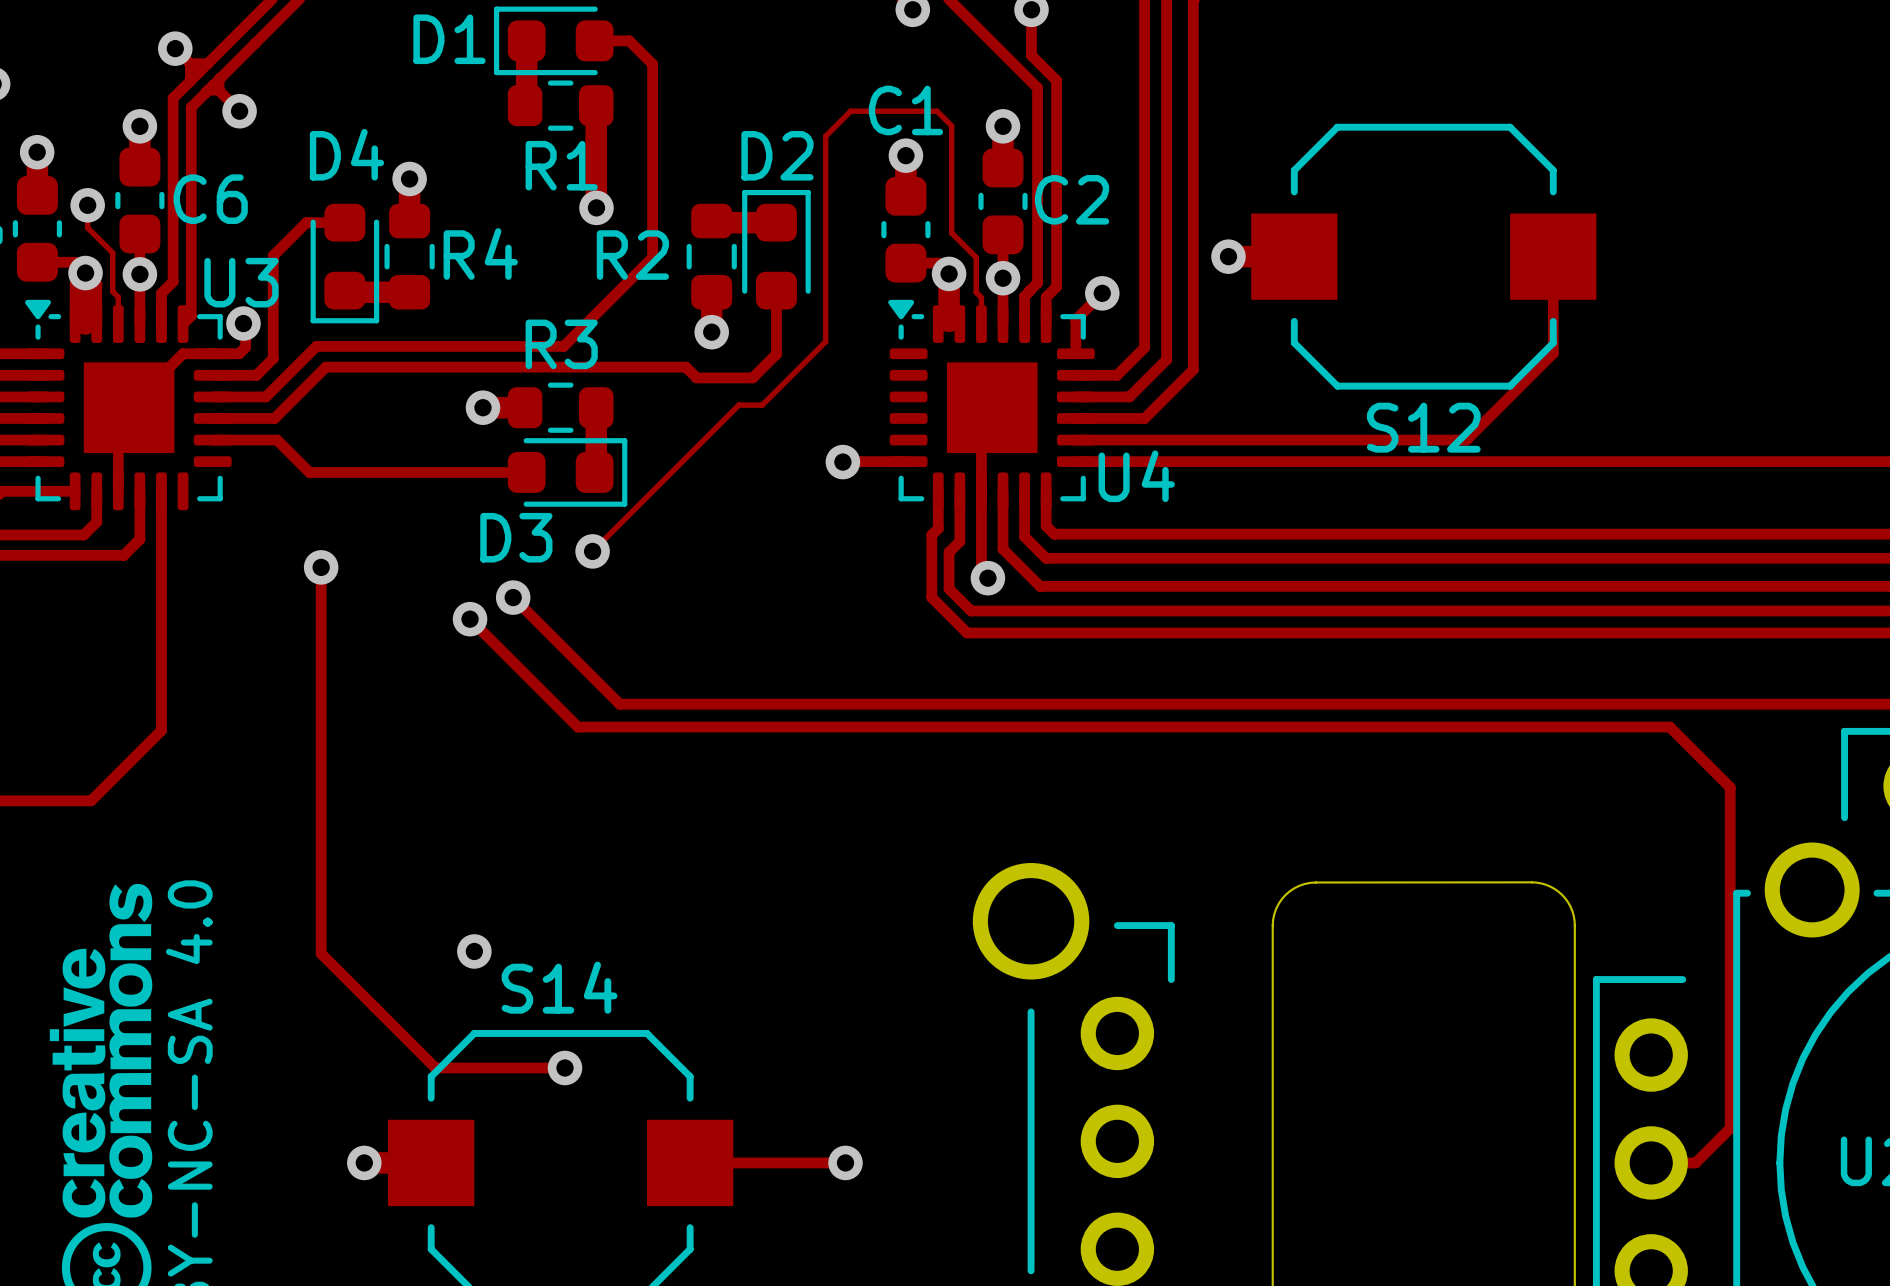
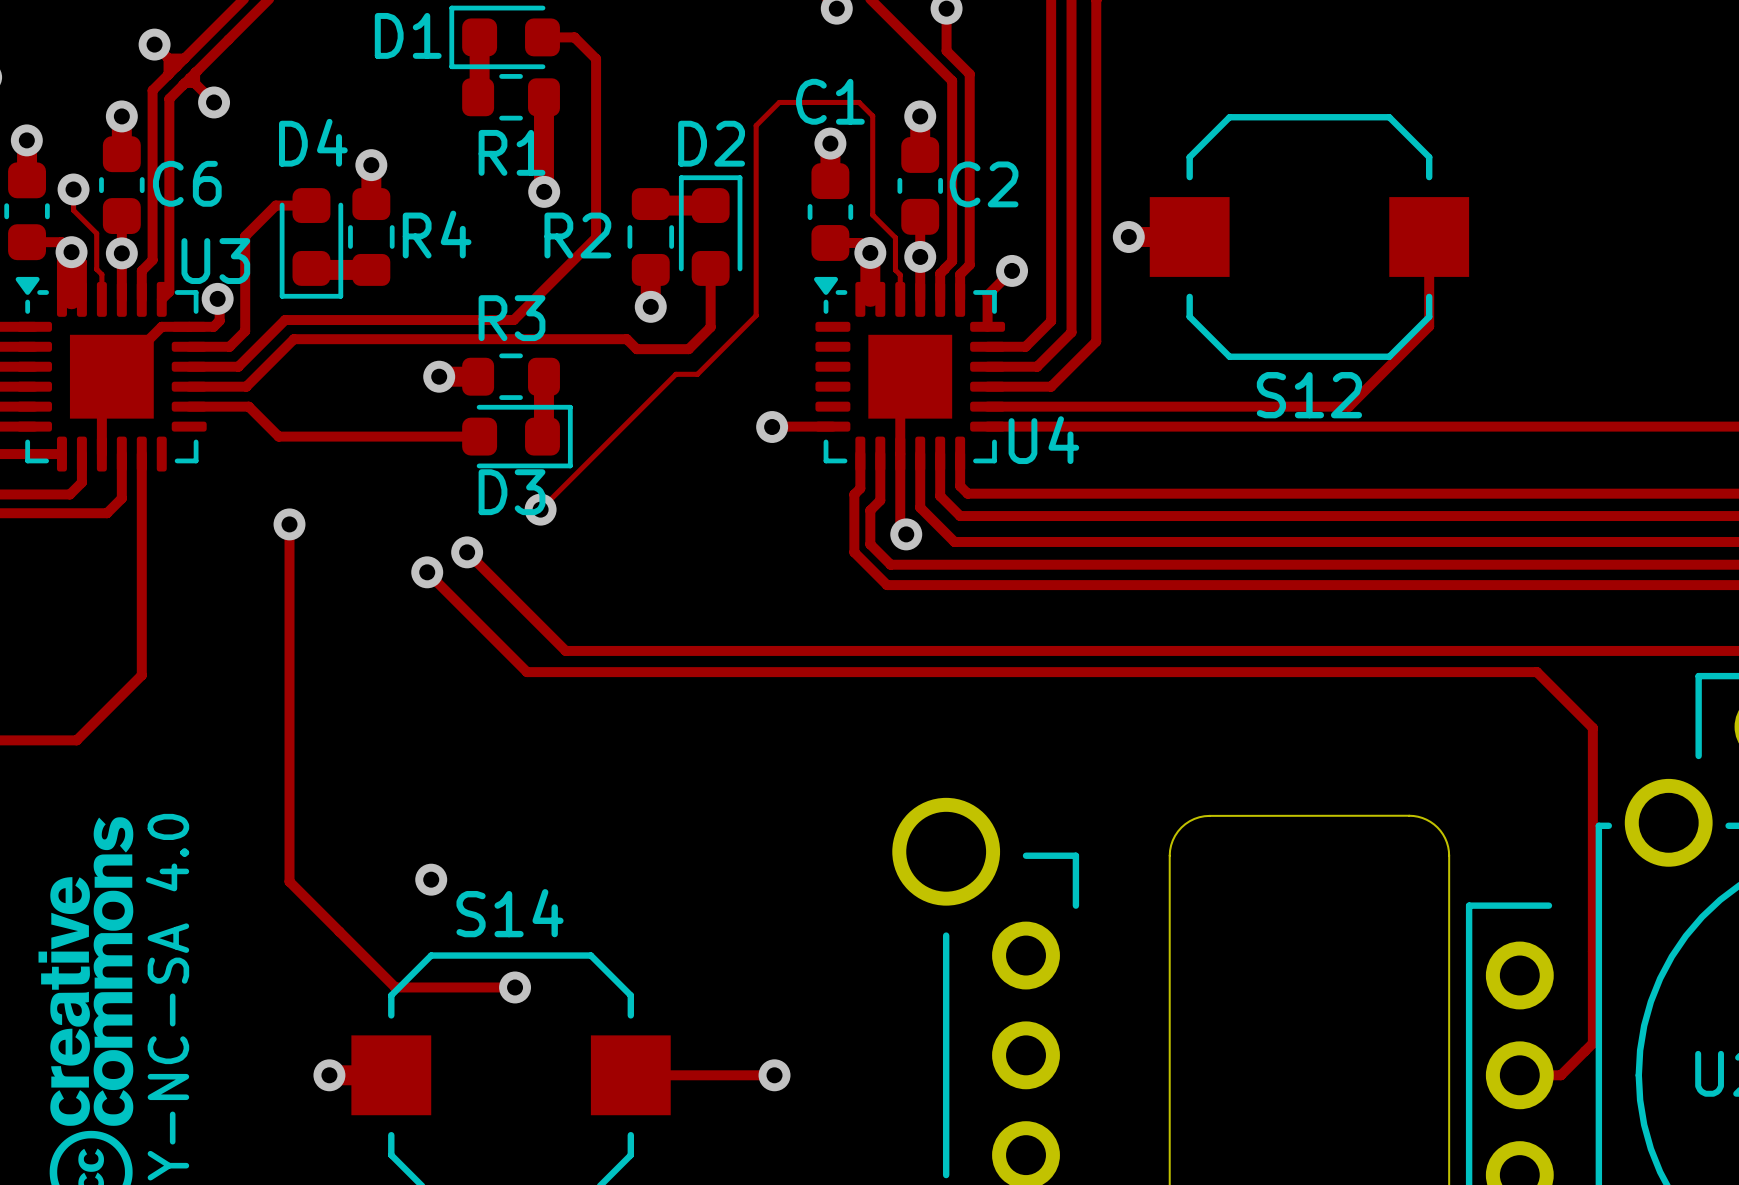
D3 name position: D3 (516, 537) -> D3 (512, 492)

